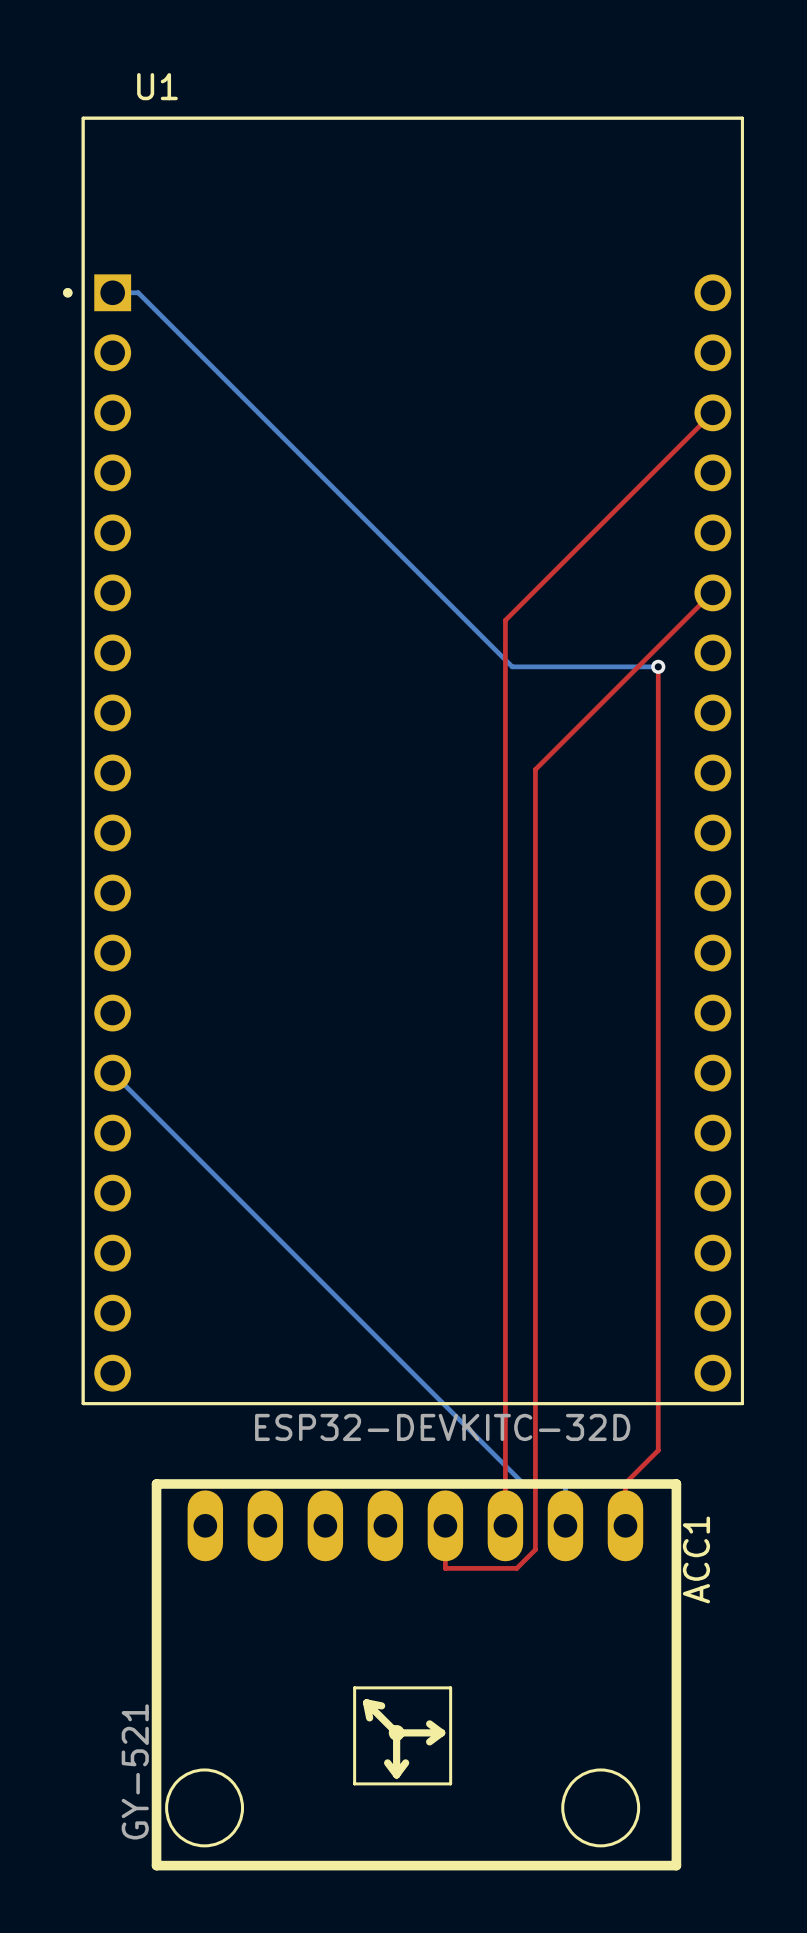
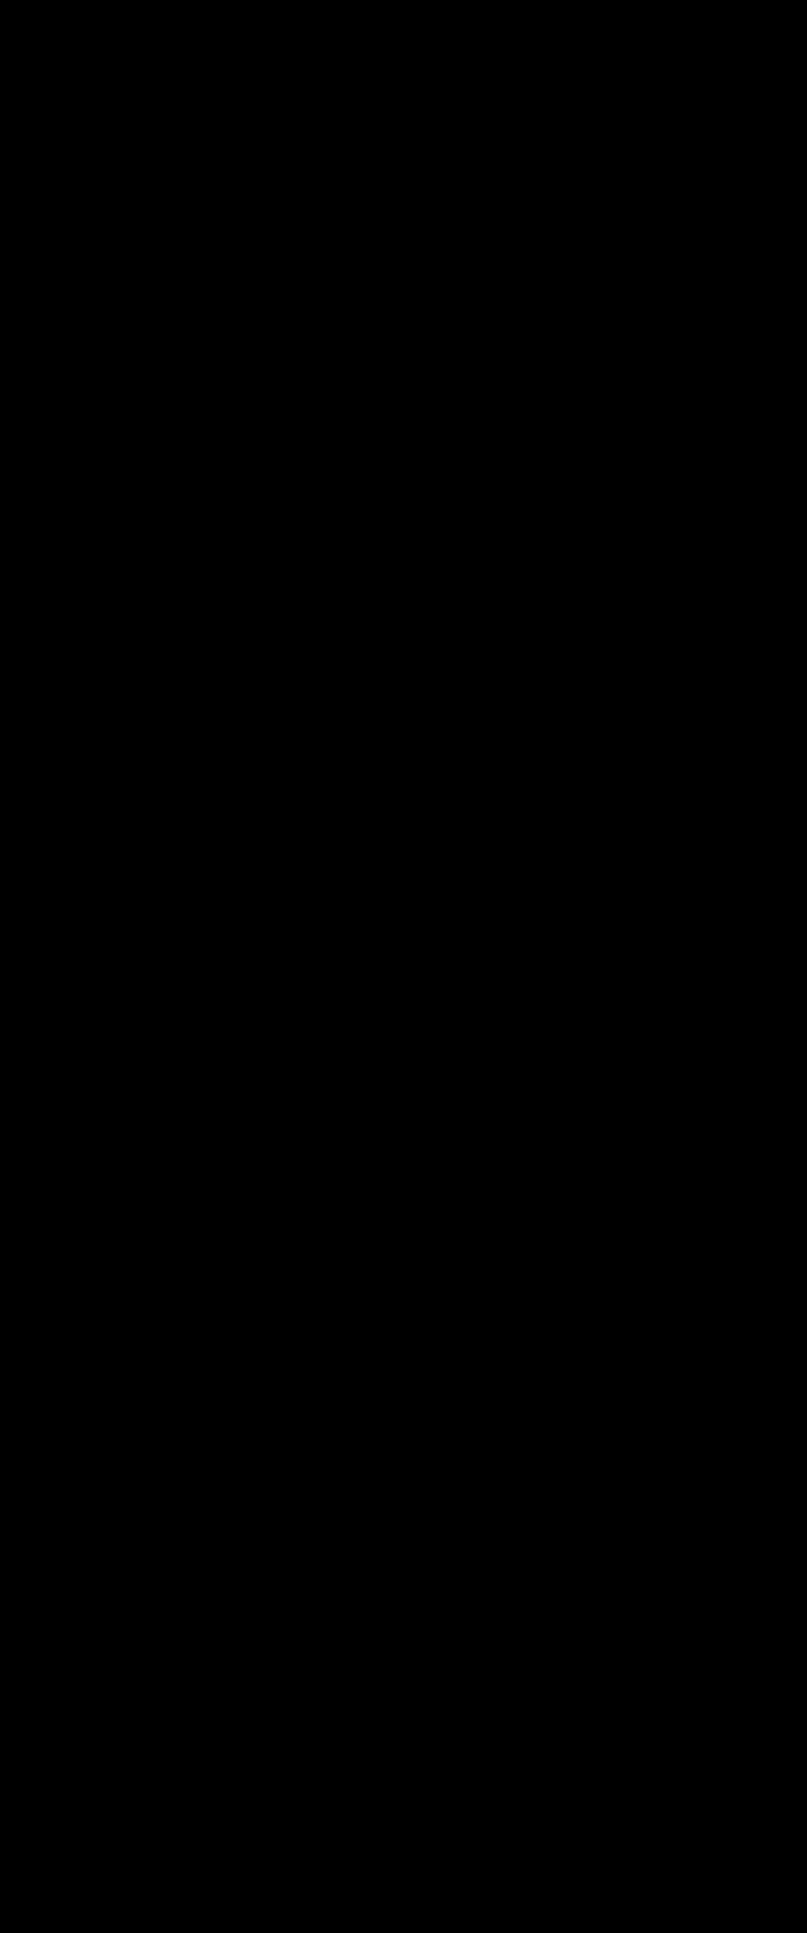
bottom track: (112, 292) (138, 292) (512, 666) (658, 666) -> none
top track: (712, 412) (505, 620) (505, 1525) -> none
top track: (712, 592) (535, 769) (535, 1549) (516, 1568) (445, 1568) (445, 1525) -> none
top track: (658, 666) (658, 1450) (625, 1483) (625, 1525) -> none
via: (658, 666) -> none
U1: ESP32-DEVKITC-32D (403, 760) -> none
bottom track: (112, 1073) (522, 1483) (565, 1483) (565, 1525) -> none
ACC1: GY-521 (416, 1674) -> none

